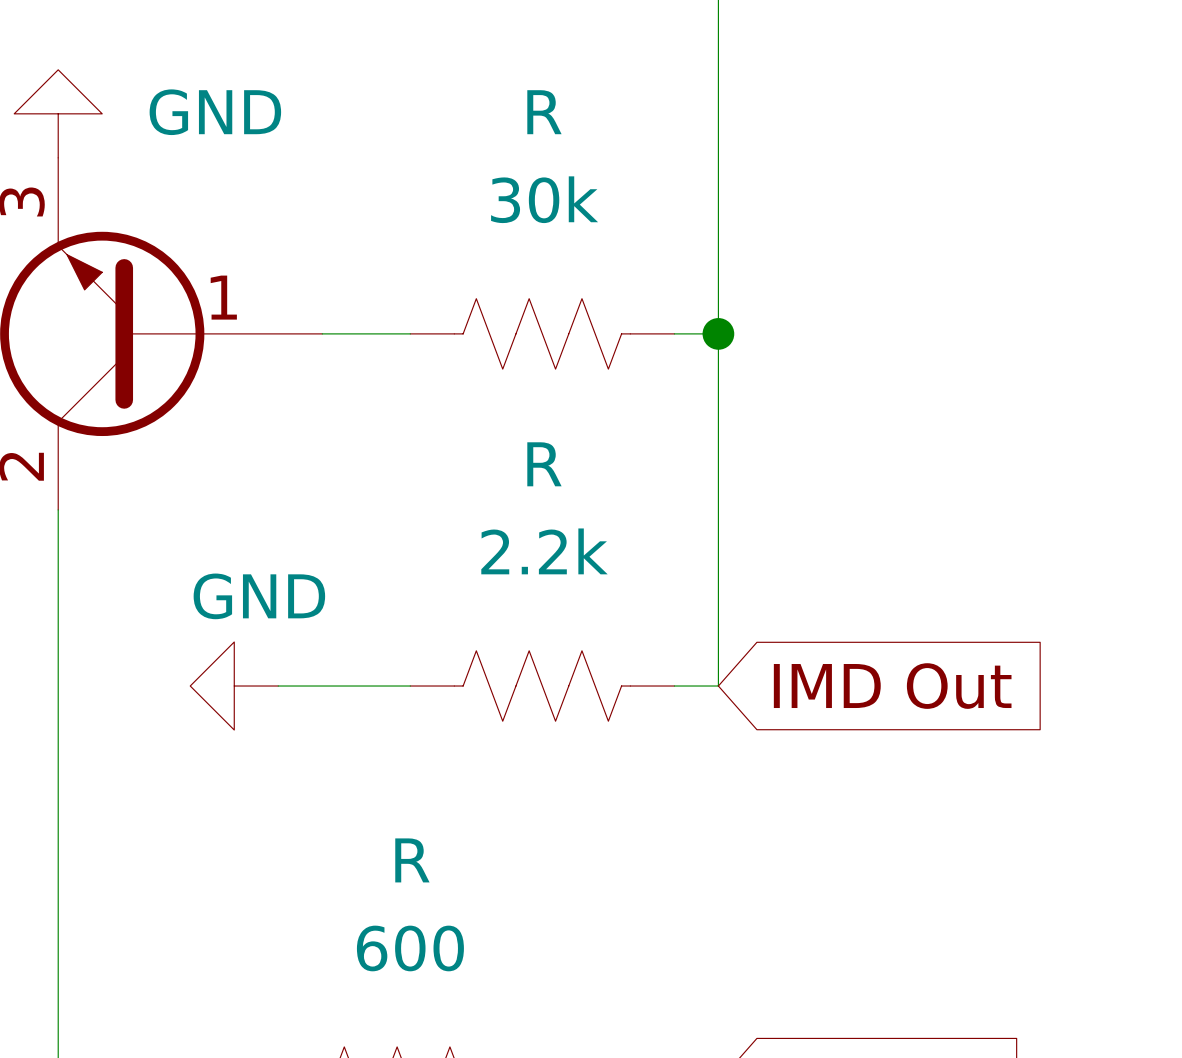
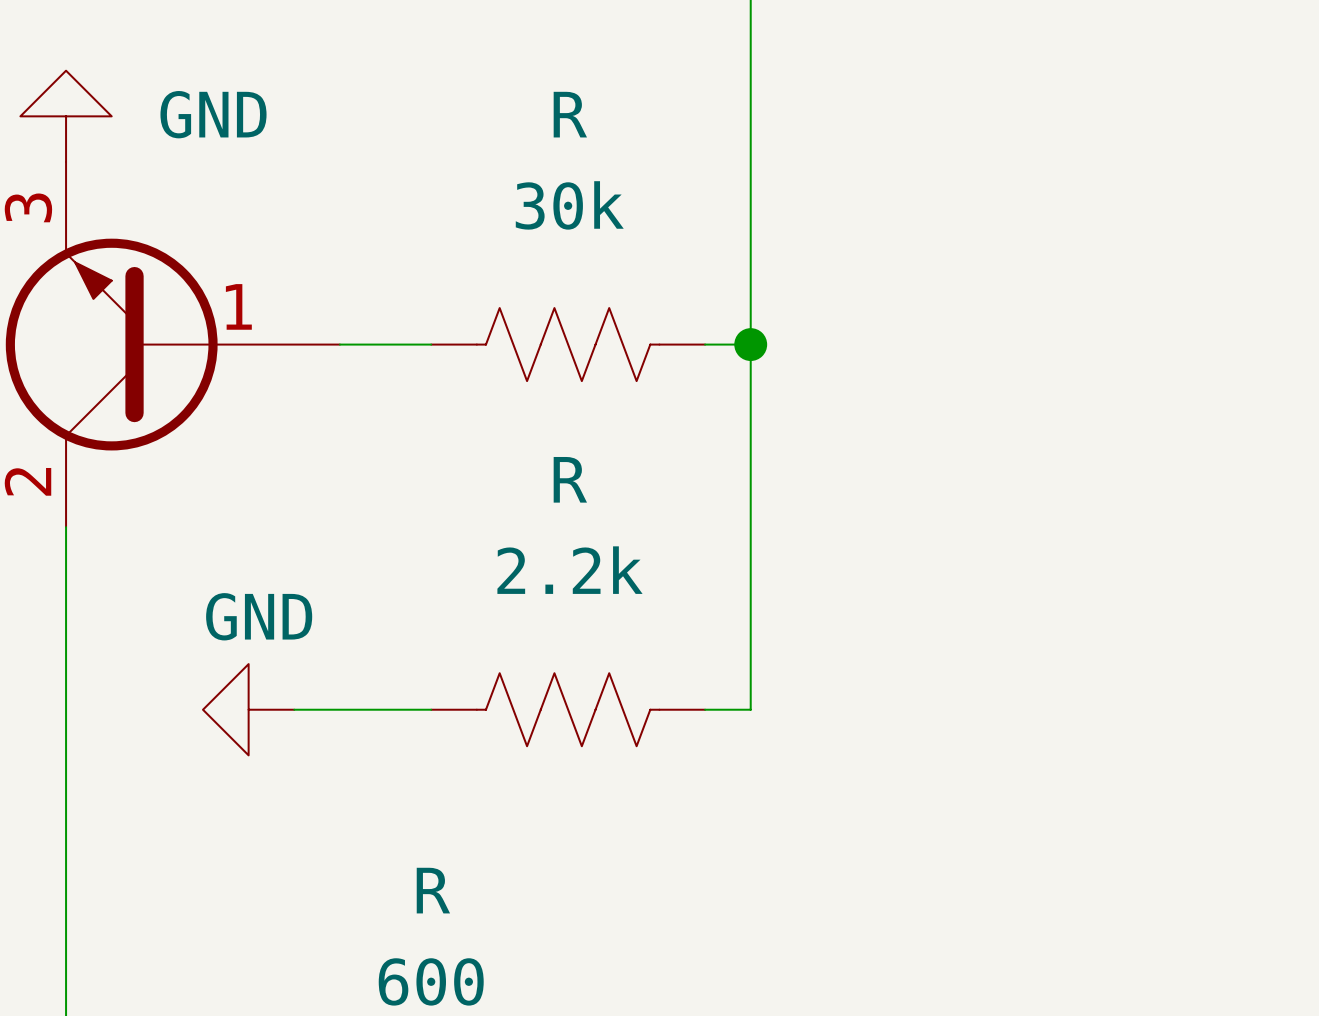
global label: IMD Out (892, 686) -> none

